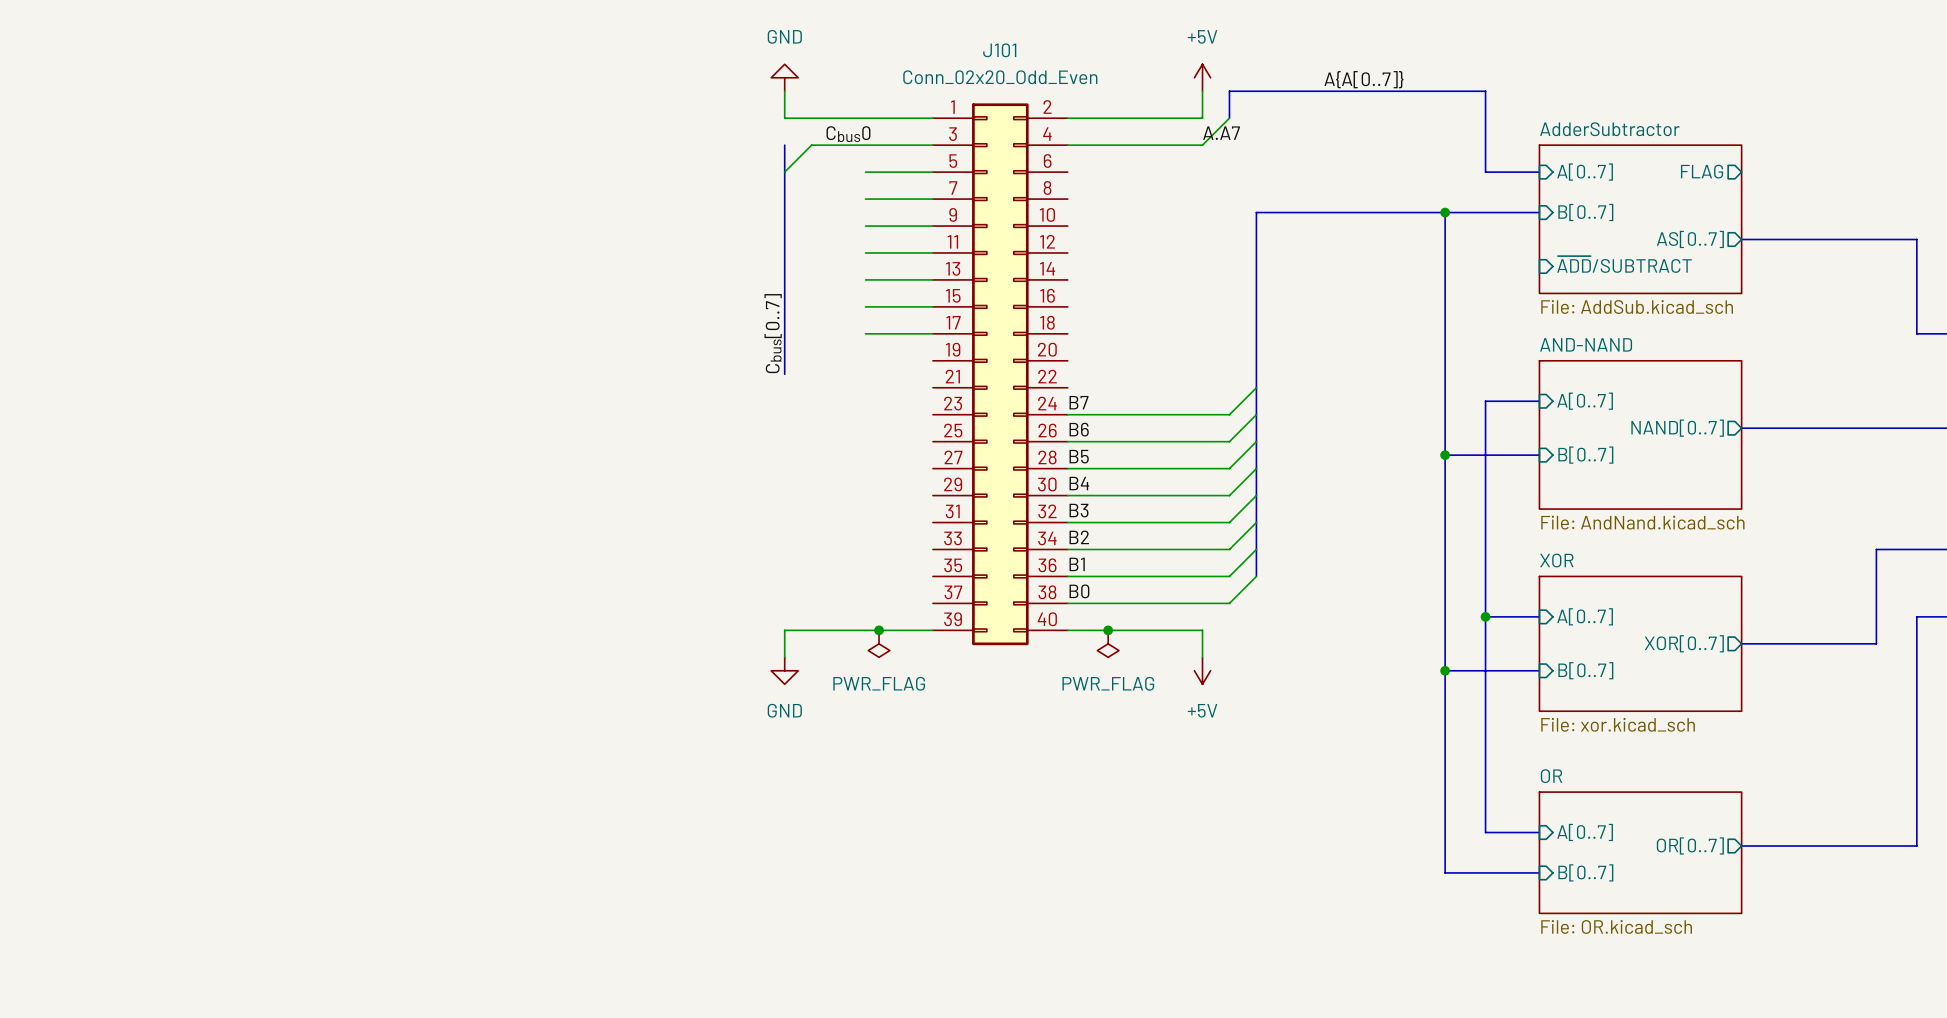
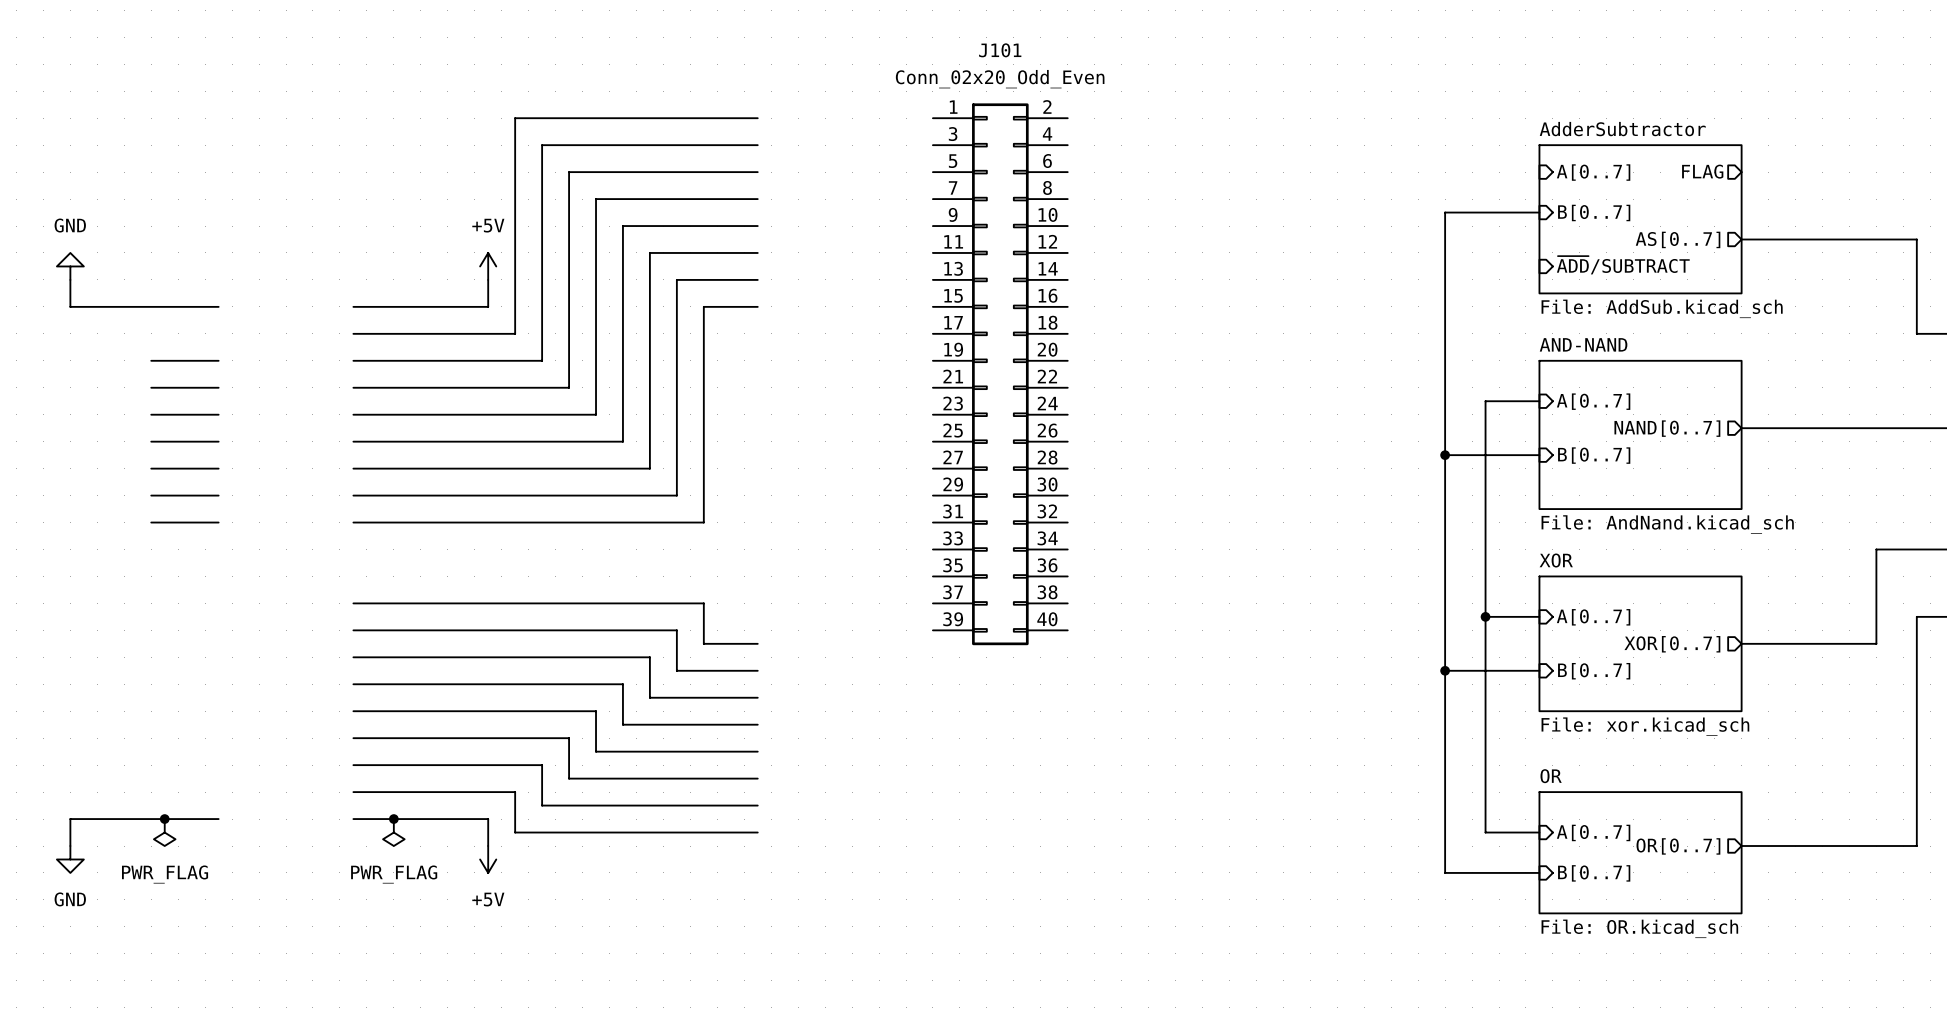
power symbol: GND (784, 77) -> none
power symbol: +5V (1202, 77) -> none
label: A{A[0..7]} (1363, 79) -> none
wire: (784, 91) (784, 118) (932, 118) -> none
wire: (1202, 91) (1202, 118) (1067, 118) -> none
wire: none -> (757, 118) (515, 118) (515, 333) (353, 333)
wire: (1229, 118) (1202, 145) (1067, 145) -> none
bus: (1229, 118) (1229, 91) (1485, 91) (1485, 172) (1539, 172) -> none
label: A.A7 (1221, 133) -> none
label: Cbus0 (848, 134) -> none
wire: none -> (757, 145) (542, 145) (542, 360) (353, 360)
bus: (784, 145) (784, 374) -> none
wire: (932, 145) (811, 145) (784, 172) -> none
wire: none -> (757, 172) (569, 172) (569, 387) (353, 387)
wire: (865, 172) (932, 172) -> none
wire: none -> (757, 199) (596, 199) (596, 414) (353, 414)
wire: (865, 199) (932, 199) -> none
bus: (1445, 212) (1256, 212) (1256, 576) -> none
junction: (1445, 212) -> none
wire: none -> (757, 226) (622, 226) (622, 441) (353, 441)
wire: (865, 226) (932, 226) -> none
wire: none -> (757, 252) (649, 252) (649, 468) (353, 468)
wire: (865, 252) (932, 252) -> none
power symbol: none -> GND (70, 266)
power symbol: none -> +5V (488, 266)
wire: none -> (70, 279) (70, 306) (218, 306)
wire: none -> (488, 279) (488, 306) (353, 306)
wire: none -> (757, 279) (676, 279) (676, 495) (353, 495)
wire: (865, 279) (932, 279) -> none
wire: none -> (757, 306) (703, 306) (703, 522) (353, 522)
wire: (865, 306) (932, 306) -> none
label: Cbus[0..7] (773, 333) -> none
wire: (865, 333) (932, 333) -> none
wire: none -> (151, 360) (218, 360)
wire: none -> (151, 387) (218, 387)
wire: (1256, 387) (1229, 414) (1067, 414) -> none
label: B7 (1079, 402) -> none
wire: none -> (151, 414) (218, 414)
wire: (1256, 414) (1229, 441) (1067, 441) -> none
label: B6 (1079, 429) -> none
wire: none -> (151, 441) (218, 441)
wire: (1256, 441) (1229, 468) (1067, 468) -> none
label: B5 (1079, 456) -> none
wire: none -> (151, 468) (218, 468)
wire: (1256, 468) (1229, 495) (1067, 495) -> none
label: B4 (1079, 483) -> none
wire: none -> (151, 495) (218, 495)
wire: (1256, 495) (1229, 522) (1067, 522) -> none
label: B3 (1079, 510) -> none
wire: none -> (151, 522) (218, 522)
wire: (1256, 522) (1229, 549) (1067, 549) -> none
label: B2 (1079, 537) -> none
wire: (1256, 549) (1229, 576) (1067, 576) -> none
label: B1 (1077, 564) -> none
wire: (1256, 576) (1229, 603) (1067, 603) -> none
label: B0 (1079, 591) -> none
wire: none -> (353, 603) (703, 603) (703, 643) (757, 643)
wire: none -> (353, 630) (676, 630) (676, 670) (757, 670)
junction: (879, 630) -> none
wire: (932, 630) (784, 630) (784, 657) -> none
wire: (1067, 630) (1202, 630) (1202, 657) -> none
junction: (1108, 630) -> none
power symbol: PWR_FLAG (879, 643) -> none
power symbol: PWR_FLAG (1108, 643) -> none
wire: none -> (353, 657) (649, 657) (649, 697) (757, 697)
power symbol: GND (784, 670) -> none
power symbol: +5V (1202, 670) -> none
wire: none -> (353, 684) (622, 684) (622, 724) (757, 724)
wire: none -> (353, 711) (596, 711) (596, 751) (757, 751)
wire: none -> (353, 738) (569, 738) (569, 778) (757, 778)
wire: none -> (353, 765) (542, 765) (542, 805) (757, 805)
wire: none -> (353, 792) (515, 792) (515, 832) (757, 832)
junction: none -> (164, 819)
wire: none -> (218, 819) (70, 819) (70, 846)
wire: none -> (353, 819) (488, 819) (488, 846)
junction: none -> (393, 819)
power symbol: none -> PWR_FLAG (164, 832)
power symbol: none -> PWR_FLAG (393, 832)
power symbol: none -> GND (70, 859)
power symbol: none -> +5V (488, 859)

